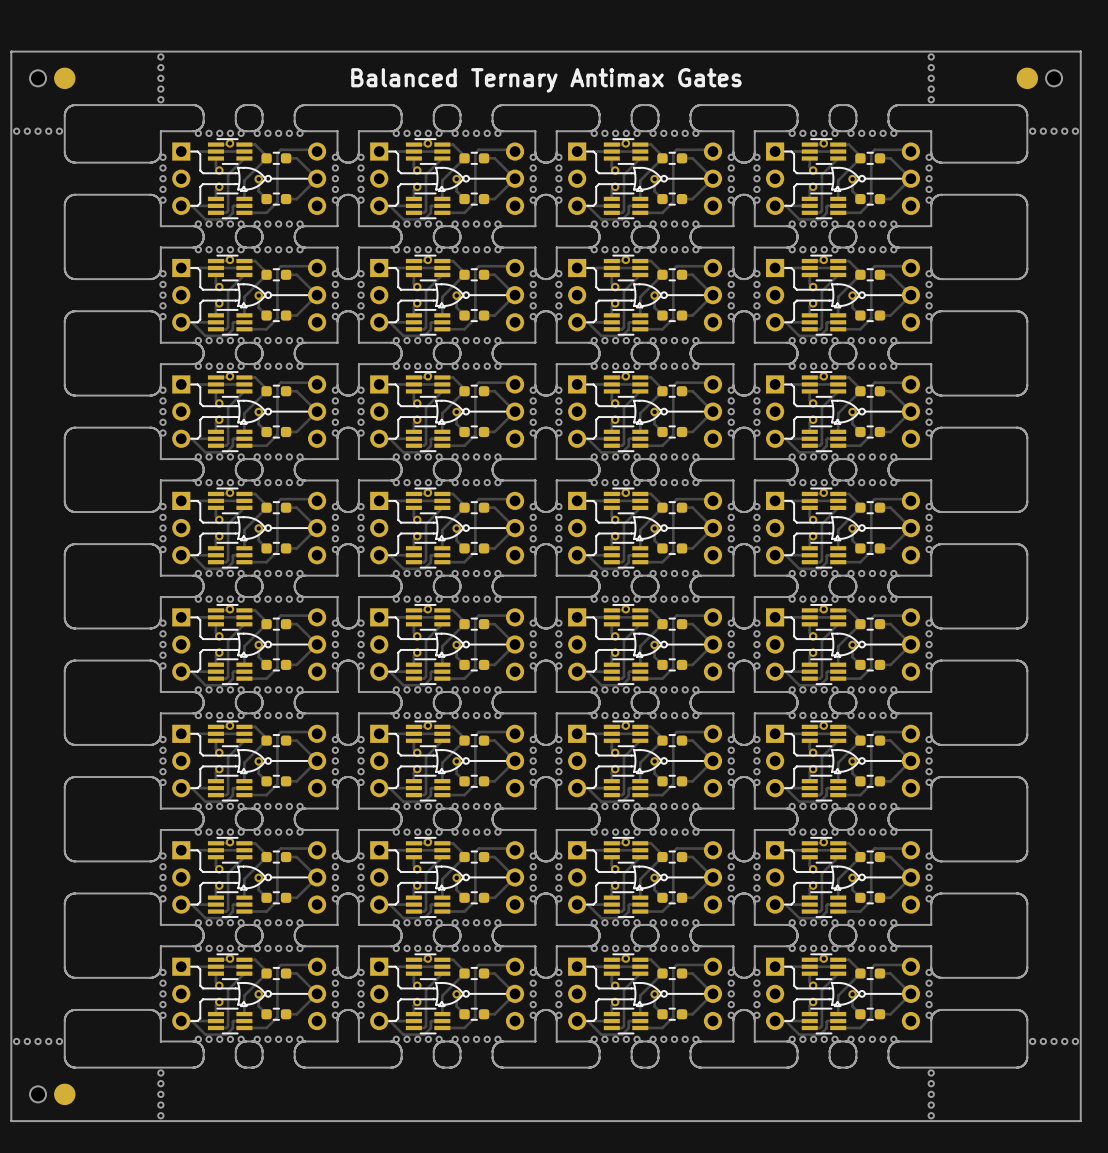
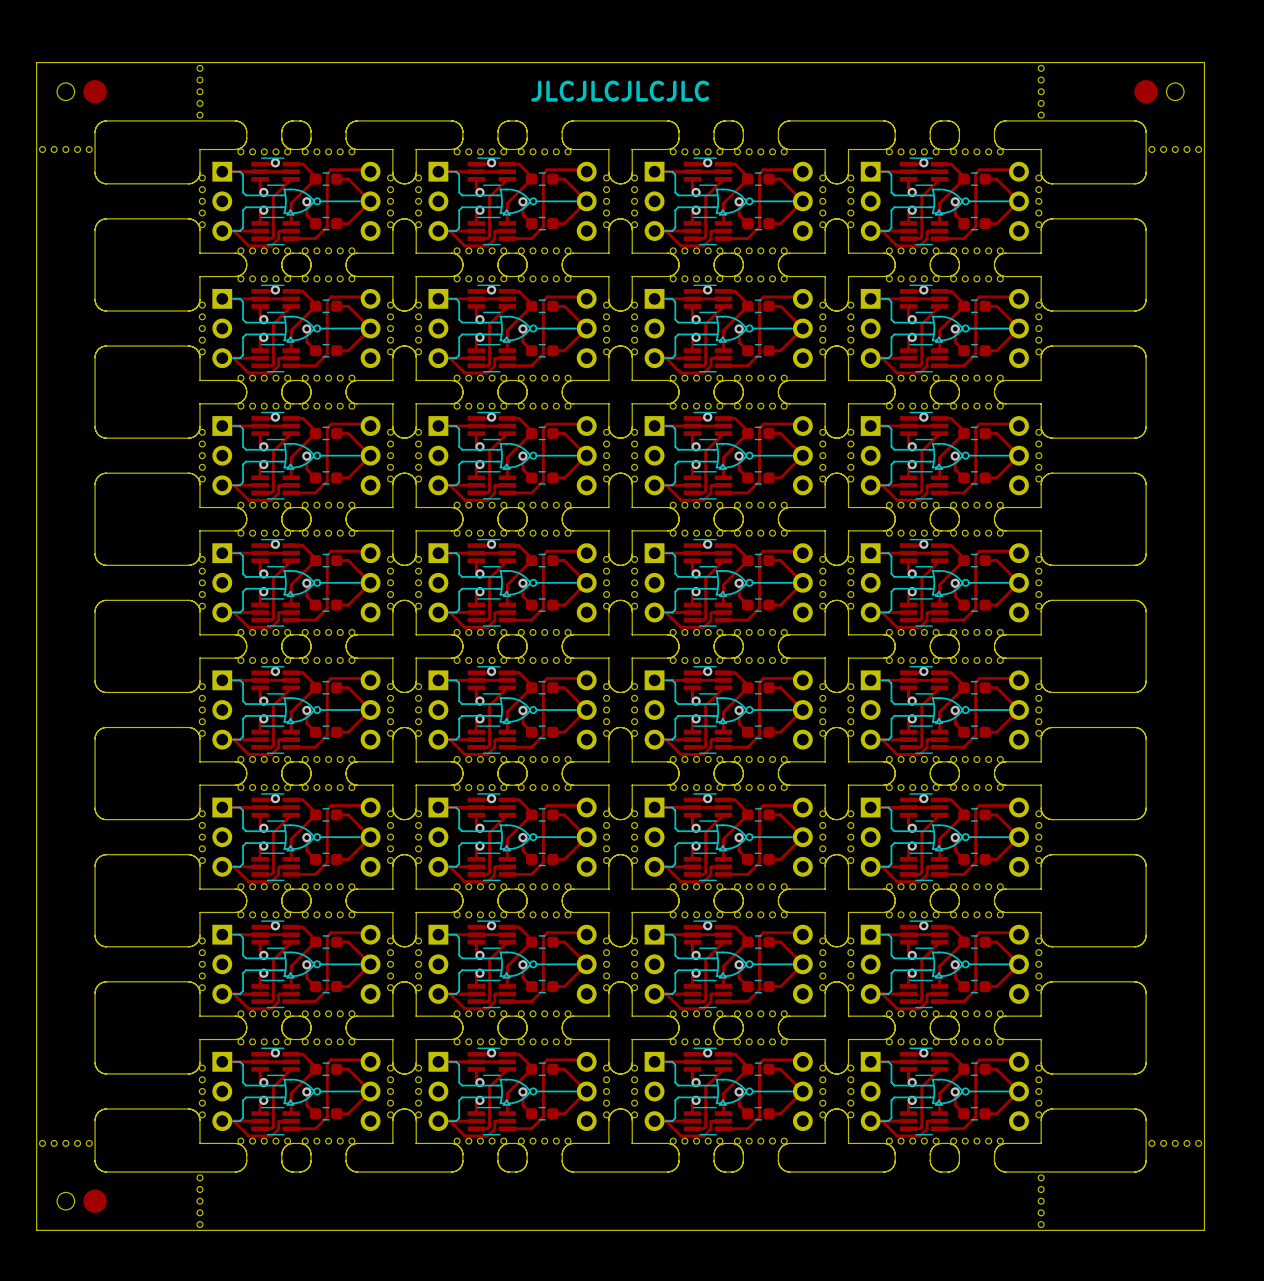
text: Balanced Ternary Antimax Gates (546, 80) -> JLCJLCJLCJLC (620, 91)

